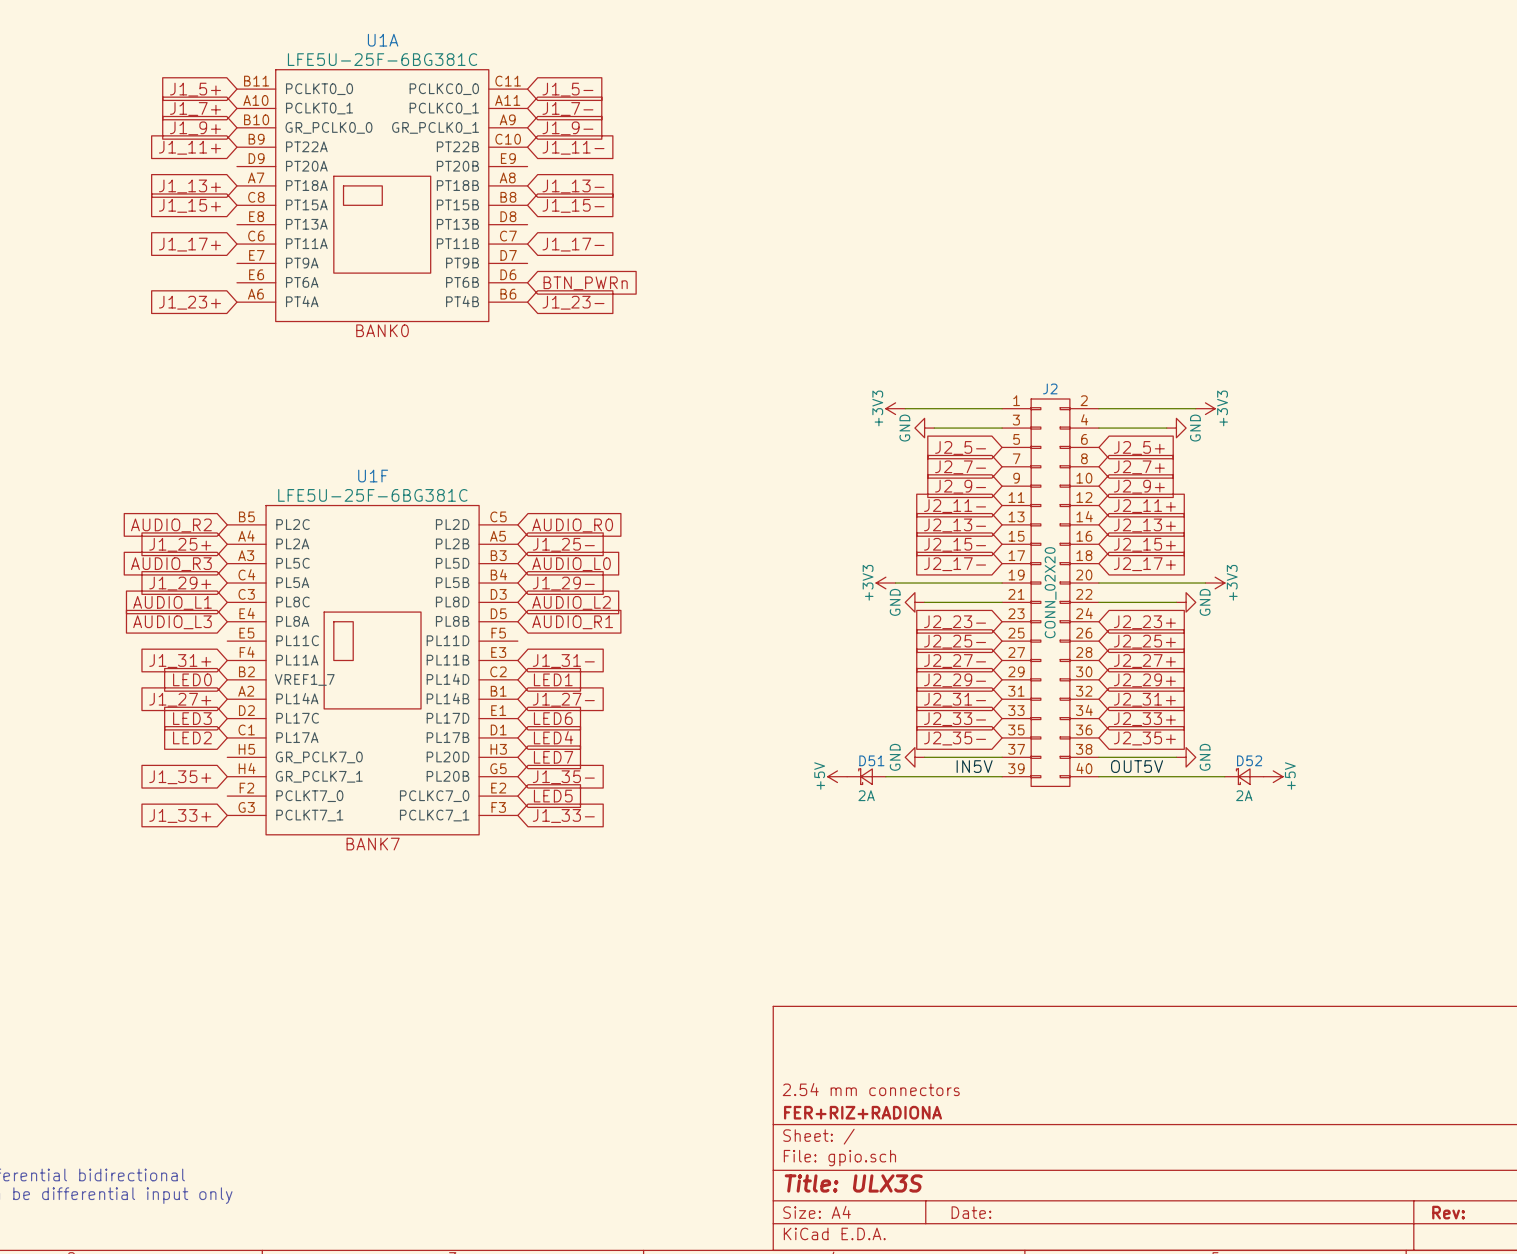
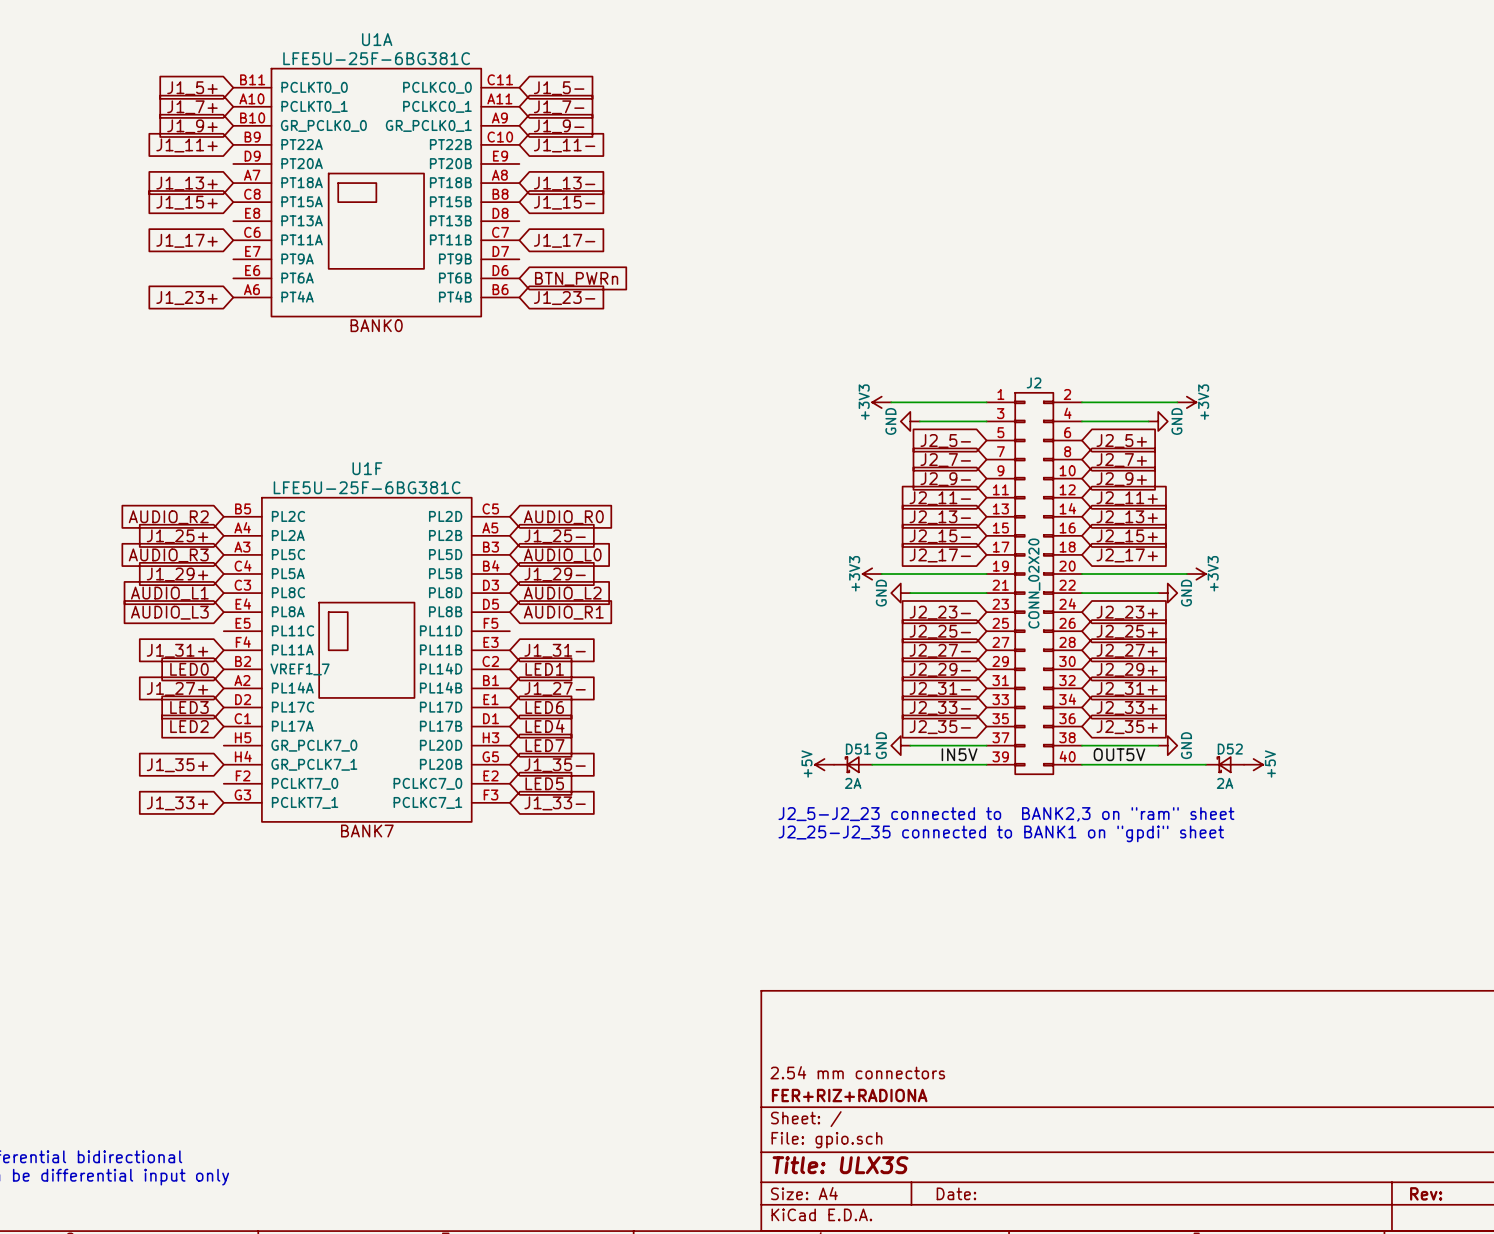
text: none -> J2_5-J2_23 connected to BANK2,3 on "ram" sheet (1006, 814)
text: none -> J2_25-J2_35 connected to BANK1 on "gpdi" sheet (1001, 833)

